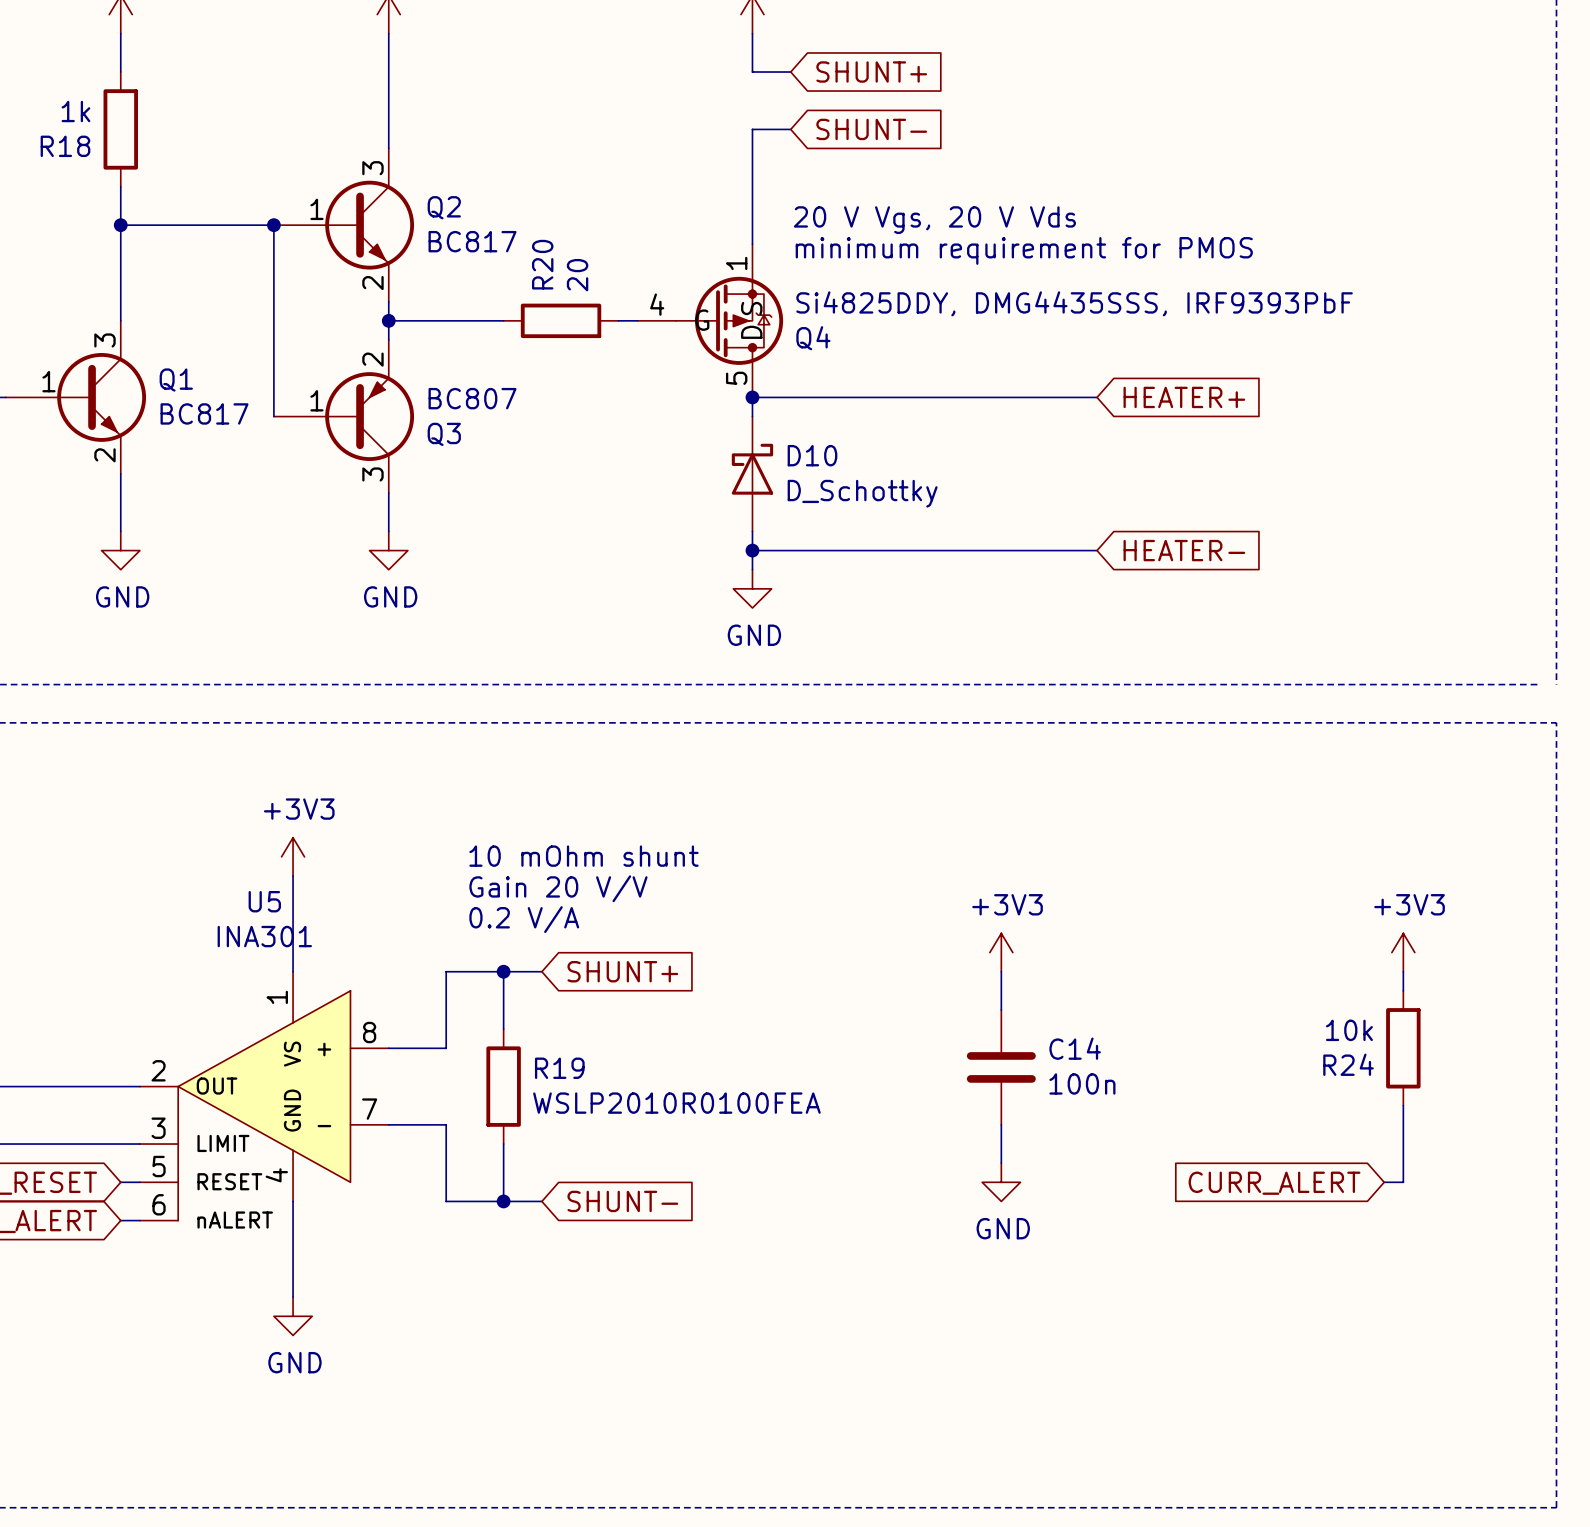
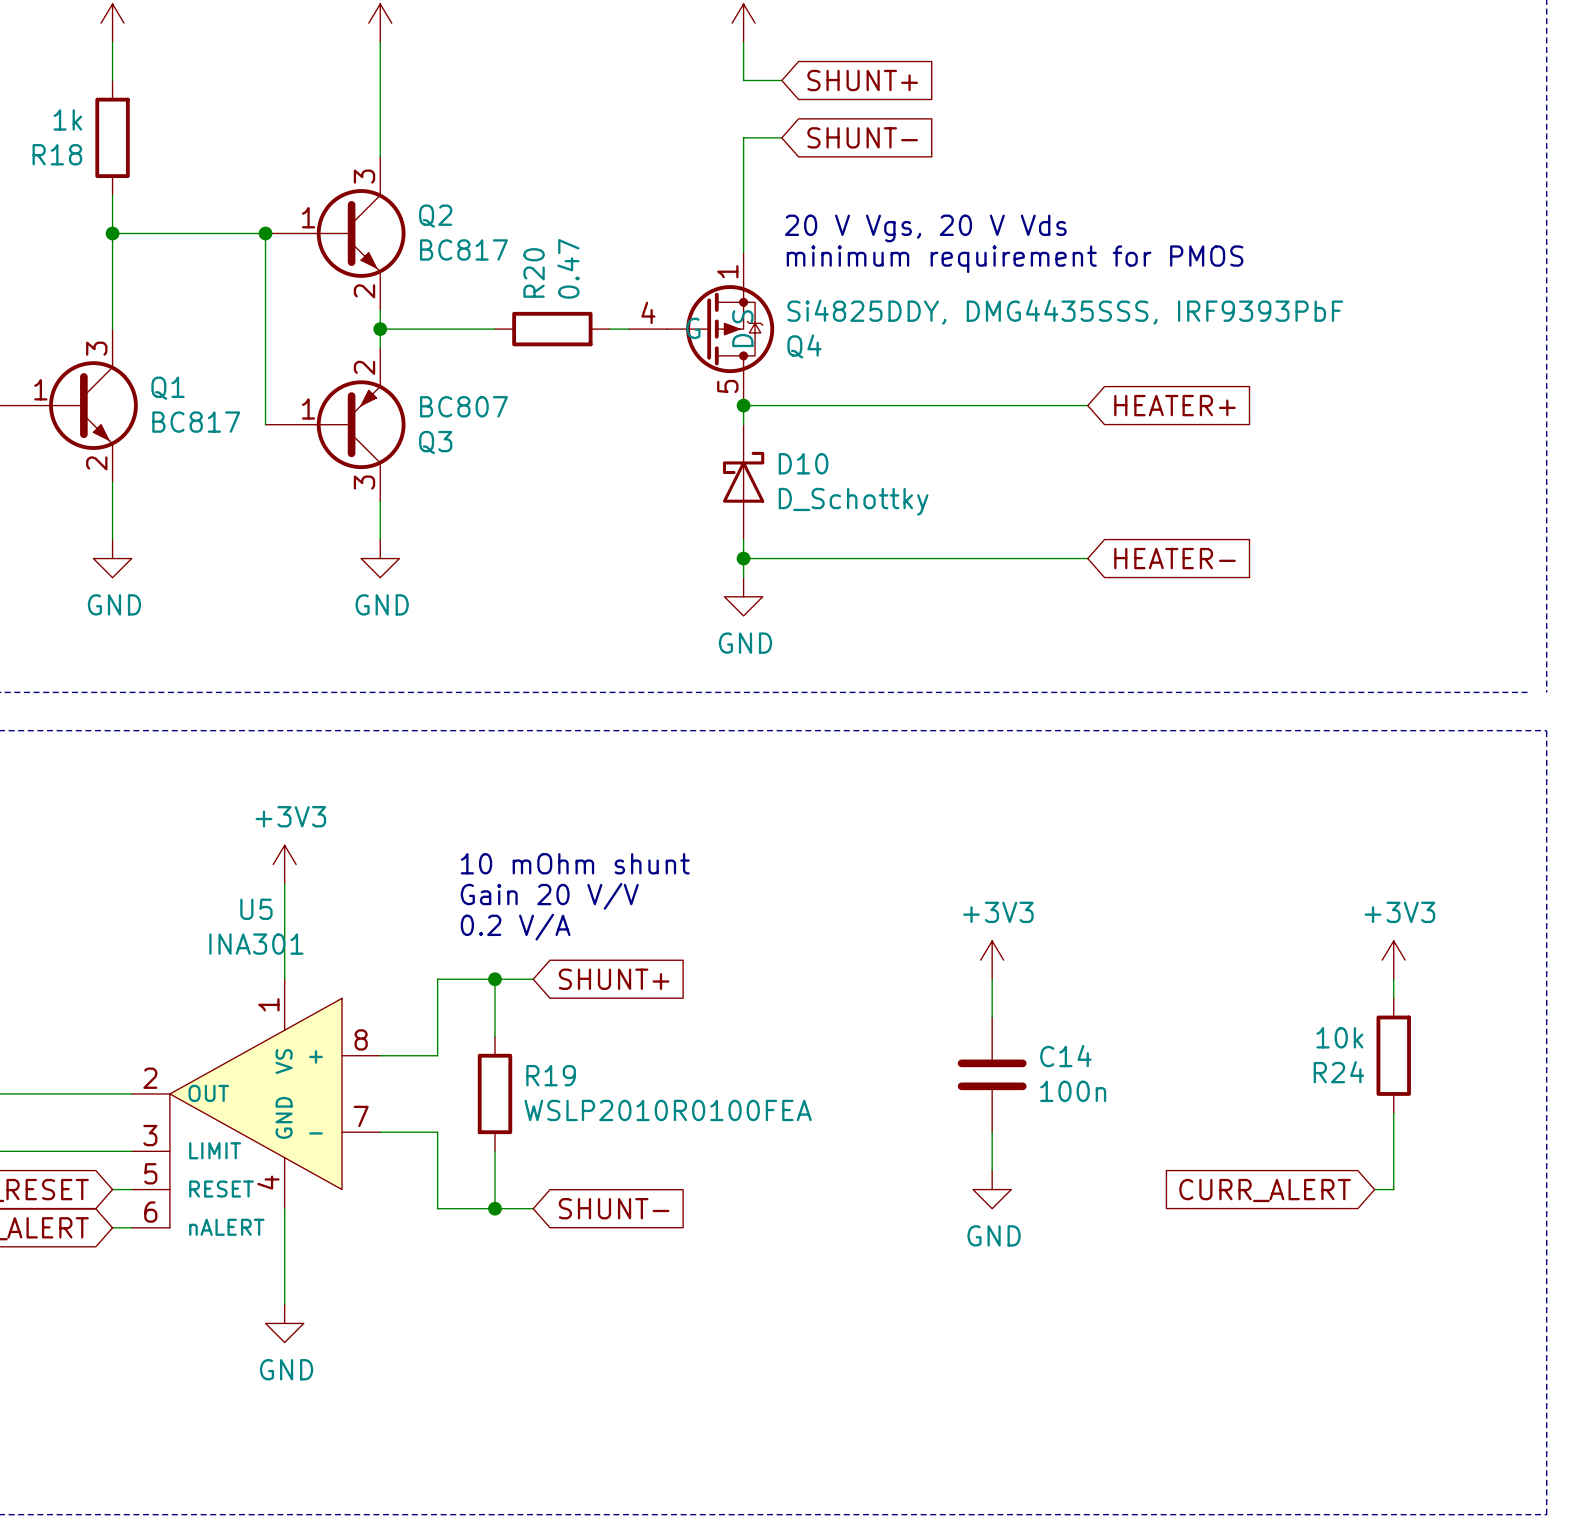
R20 value: 20 (577, 275) -> 0.47 (568, 268)

